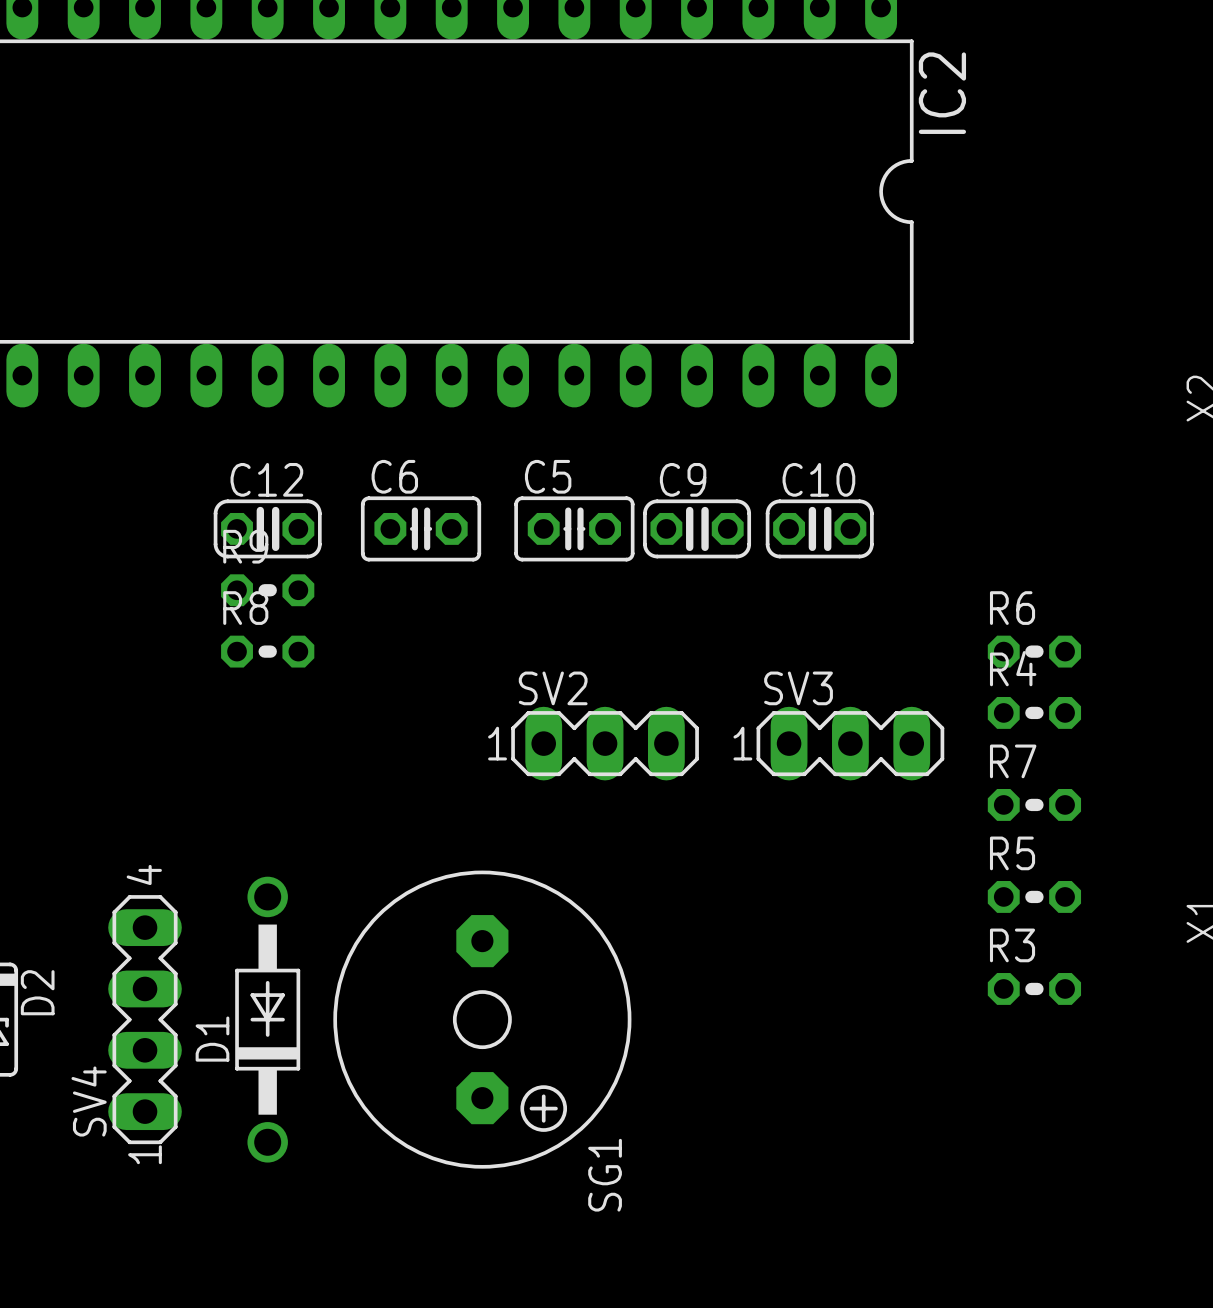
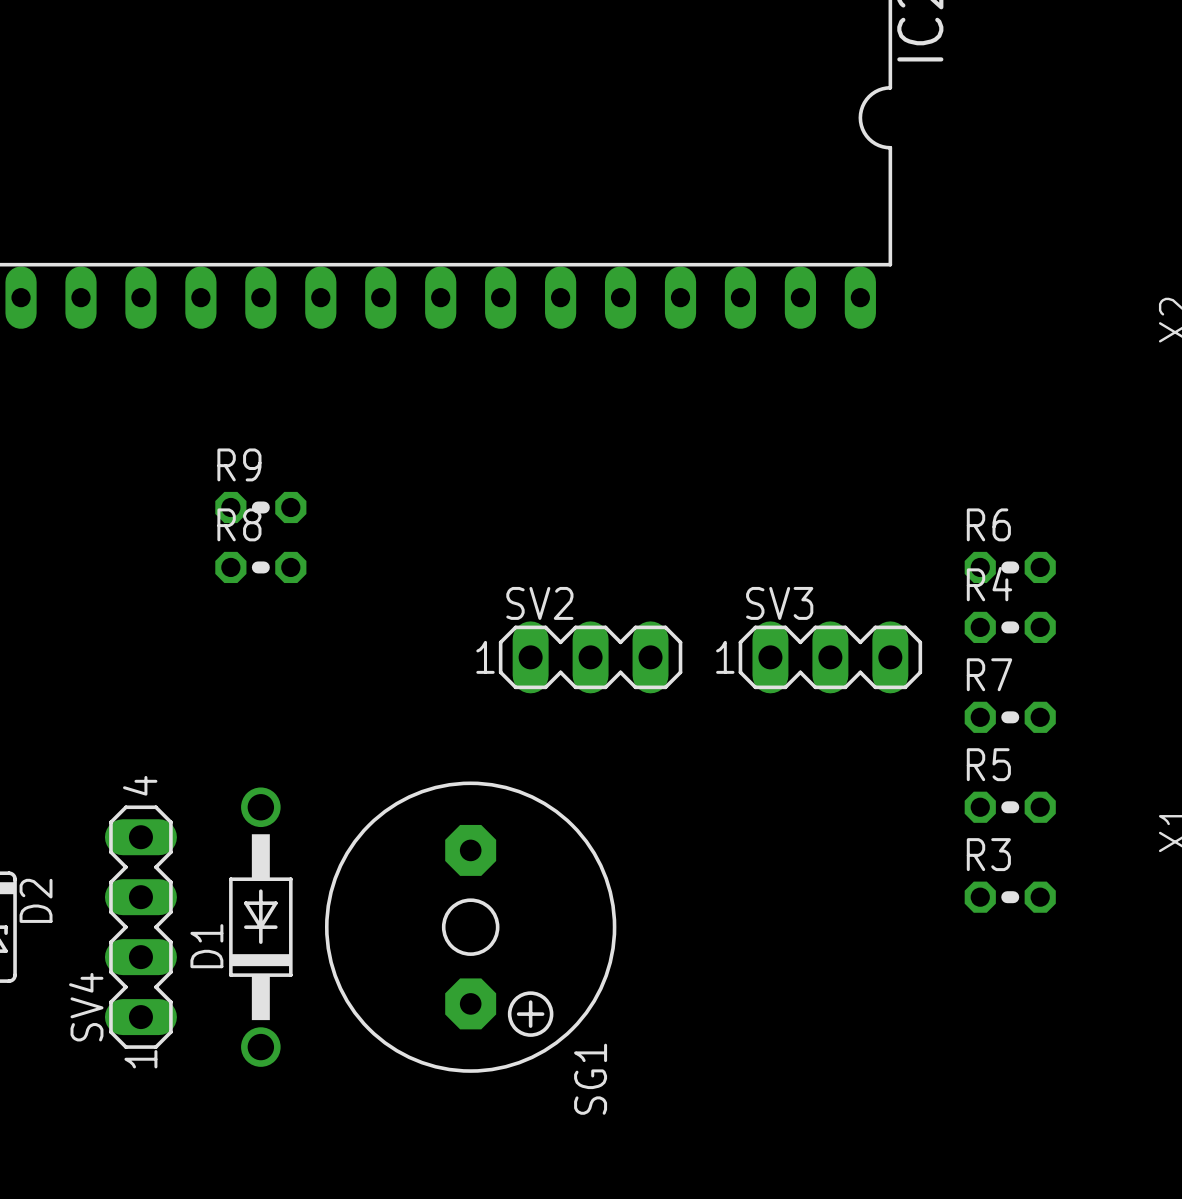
C12: (267, 528) -> none
C6: (421, 528) -> none
C5: (574, 528) -> none
C9: (697, 528) -> none
C10: (819, 528) -> none

